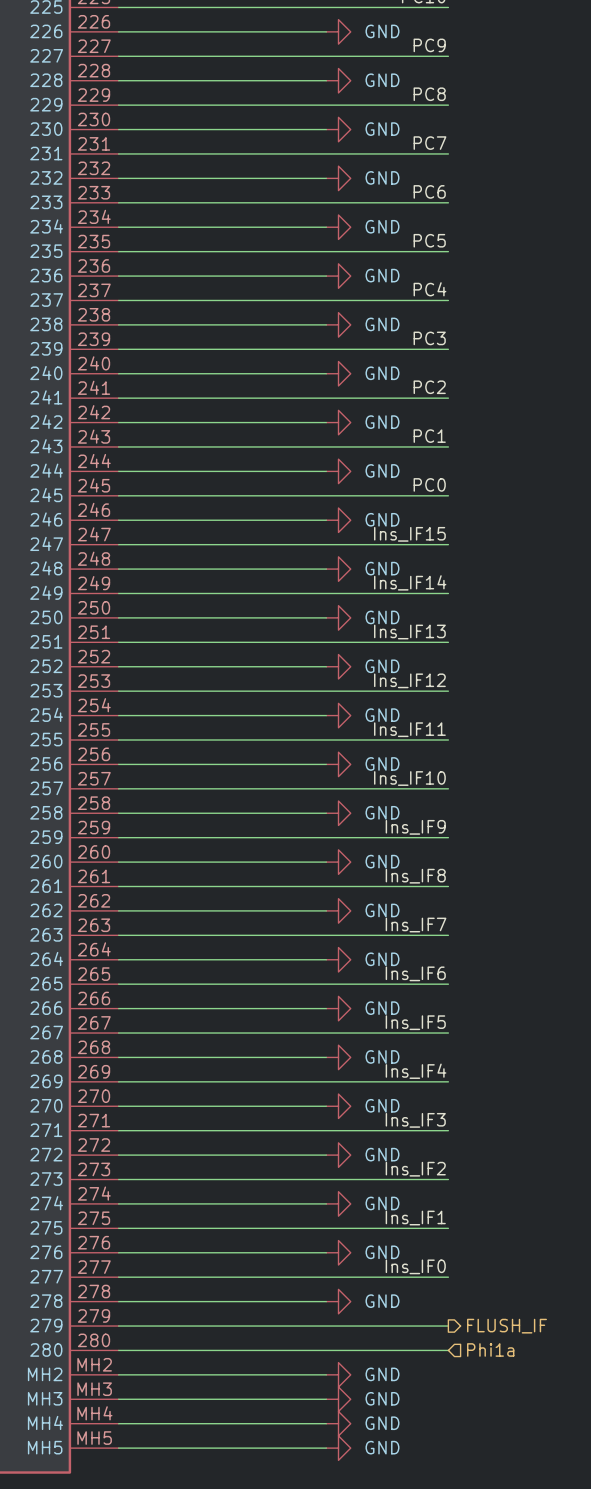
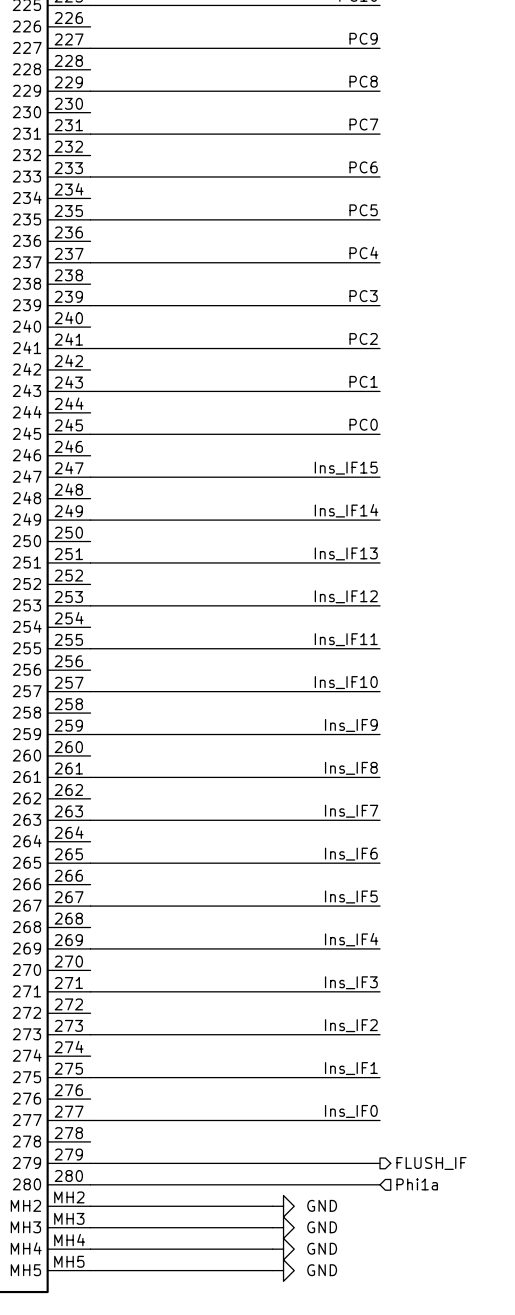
wire: (118, 31) (326, 31) -> none
power symbol: GND (338, 31) -> none
wire: (118, 80) (326, 80) -> none
power symbol: GND (338, 80) -> none
wire: (118, 129) (326, 129) -> none
power symbol: GND (338, 129) -> none
wire: (118, 178) (326, 178) -> none
power symbol: GND (338, 178) -> none
wire: (118, 227) (326, 227) -> none
power symbol: GND (338, 227) -> none
wire: (118, 276) (326, 276) -> none
power symbol: GND (338, 276) -> none
wire: (118, 324) (326, 324) -> none
power symbol: GND (338, 324) -> none
wire: (118, 373) (326, 373) -> none
power symbol: GND (338, 373) -> none
wire: (118, 422) (326, 422) -> none
power symbol: GND (338, 422) -> none
wire: (118, 471) (326, 471) -> none
power symbol: GND (338, 471) -> none
wire: (118, 520) (326, 520) -> none
power symbol: GND (338, 520) -> none
wire: (118, 569) (326, 569) -> none
power symbol: GND (338, 569) -> none
wire: (118, 617) (326, 617) -> none
power symbol: GND (338, 617) -> none
wire: (118, 666) (326, 666) -> none
power symbol: GND (338, 666) -> none
wire: (118, 715) (326, 715) -> none
power symbol: GND (338, 715) -> none
wire: (118, 764) (326, 764) -> none
power symbol: GND (338, 764) -> none
wire: (118, 813) (326, 813) -> none
power symbol: GND (338, 813) -> none
wire: (118, 862) (326, 862) -> none
power symbol: GND (338, 862) -> none
wire: (118, 910) (326, 910) -> none
power symbol: GND (338, 910) -> none
wire: (118, 959) (326, 959) -> none
power symbol: GND (338, 959) -> none
wire: (118, 1008) (326, 1008) -> none
power symbol: GND (338, 1008) -> none
wire: (118, 1057) (326, 1057) -> none
power symbol: GND (338, 1057) -> none
wire: (118, 1106) (326, 1106) -> none
power symbol: GND (338, 1106) -> none
wire: (118, 1155) (326, 1155) -> none
power symbol: GND (338, 1155) -> none
wire: (118, 1203) (326, 1203) -> none
power symbol: GND (338, 1203) -> none
wire: (118, 1252) (326, 1252) -> none
power symbol: GND (338, 1252) -> none
wire: (118, 1301) (326, 1301) -> none
power symbol: GND (338, 1301) -> none

